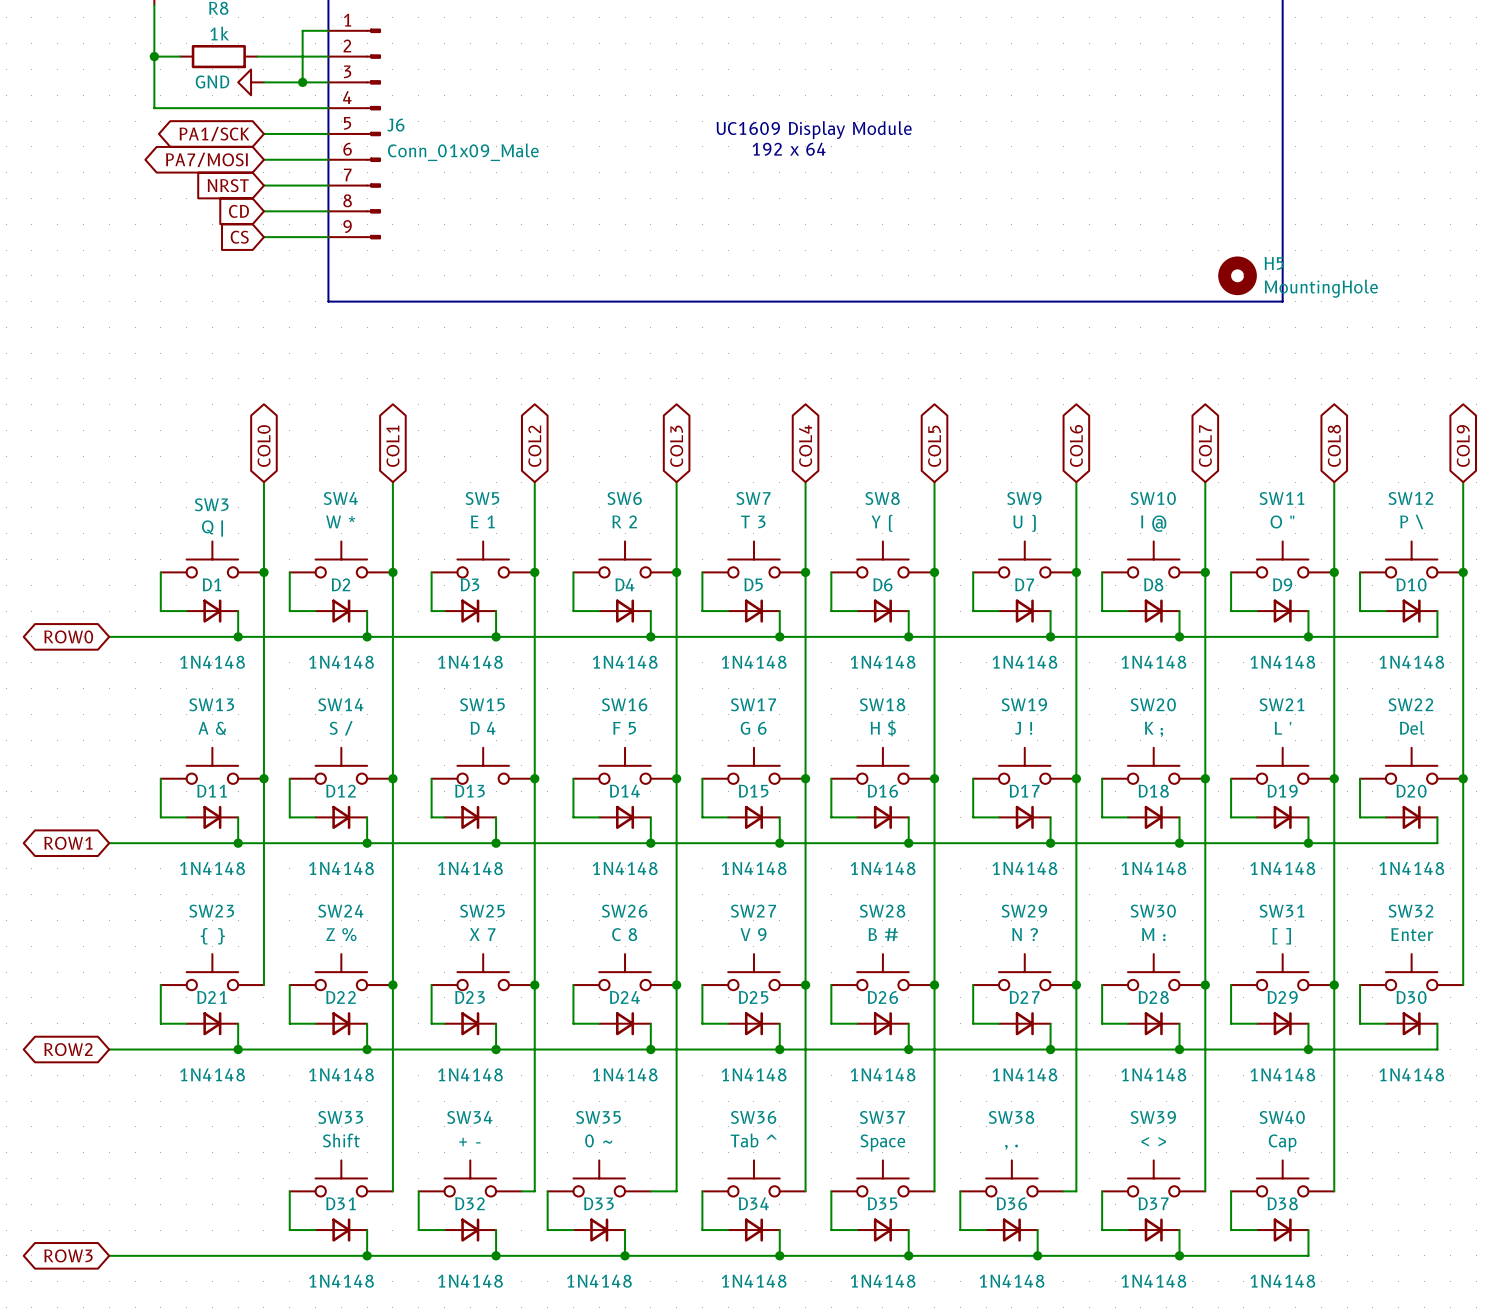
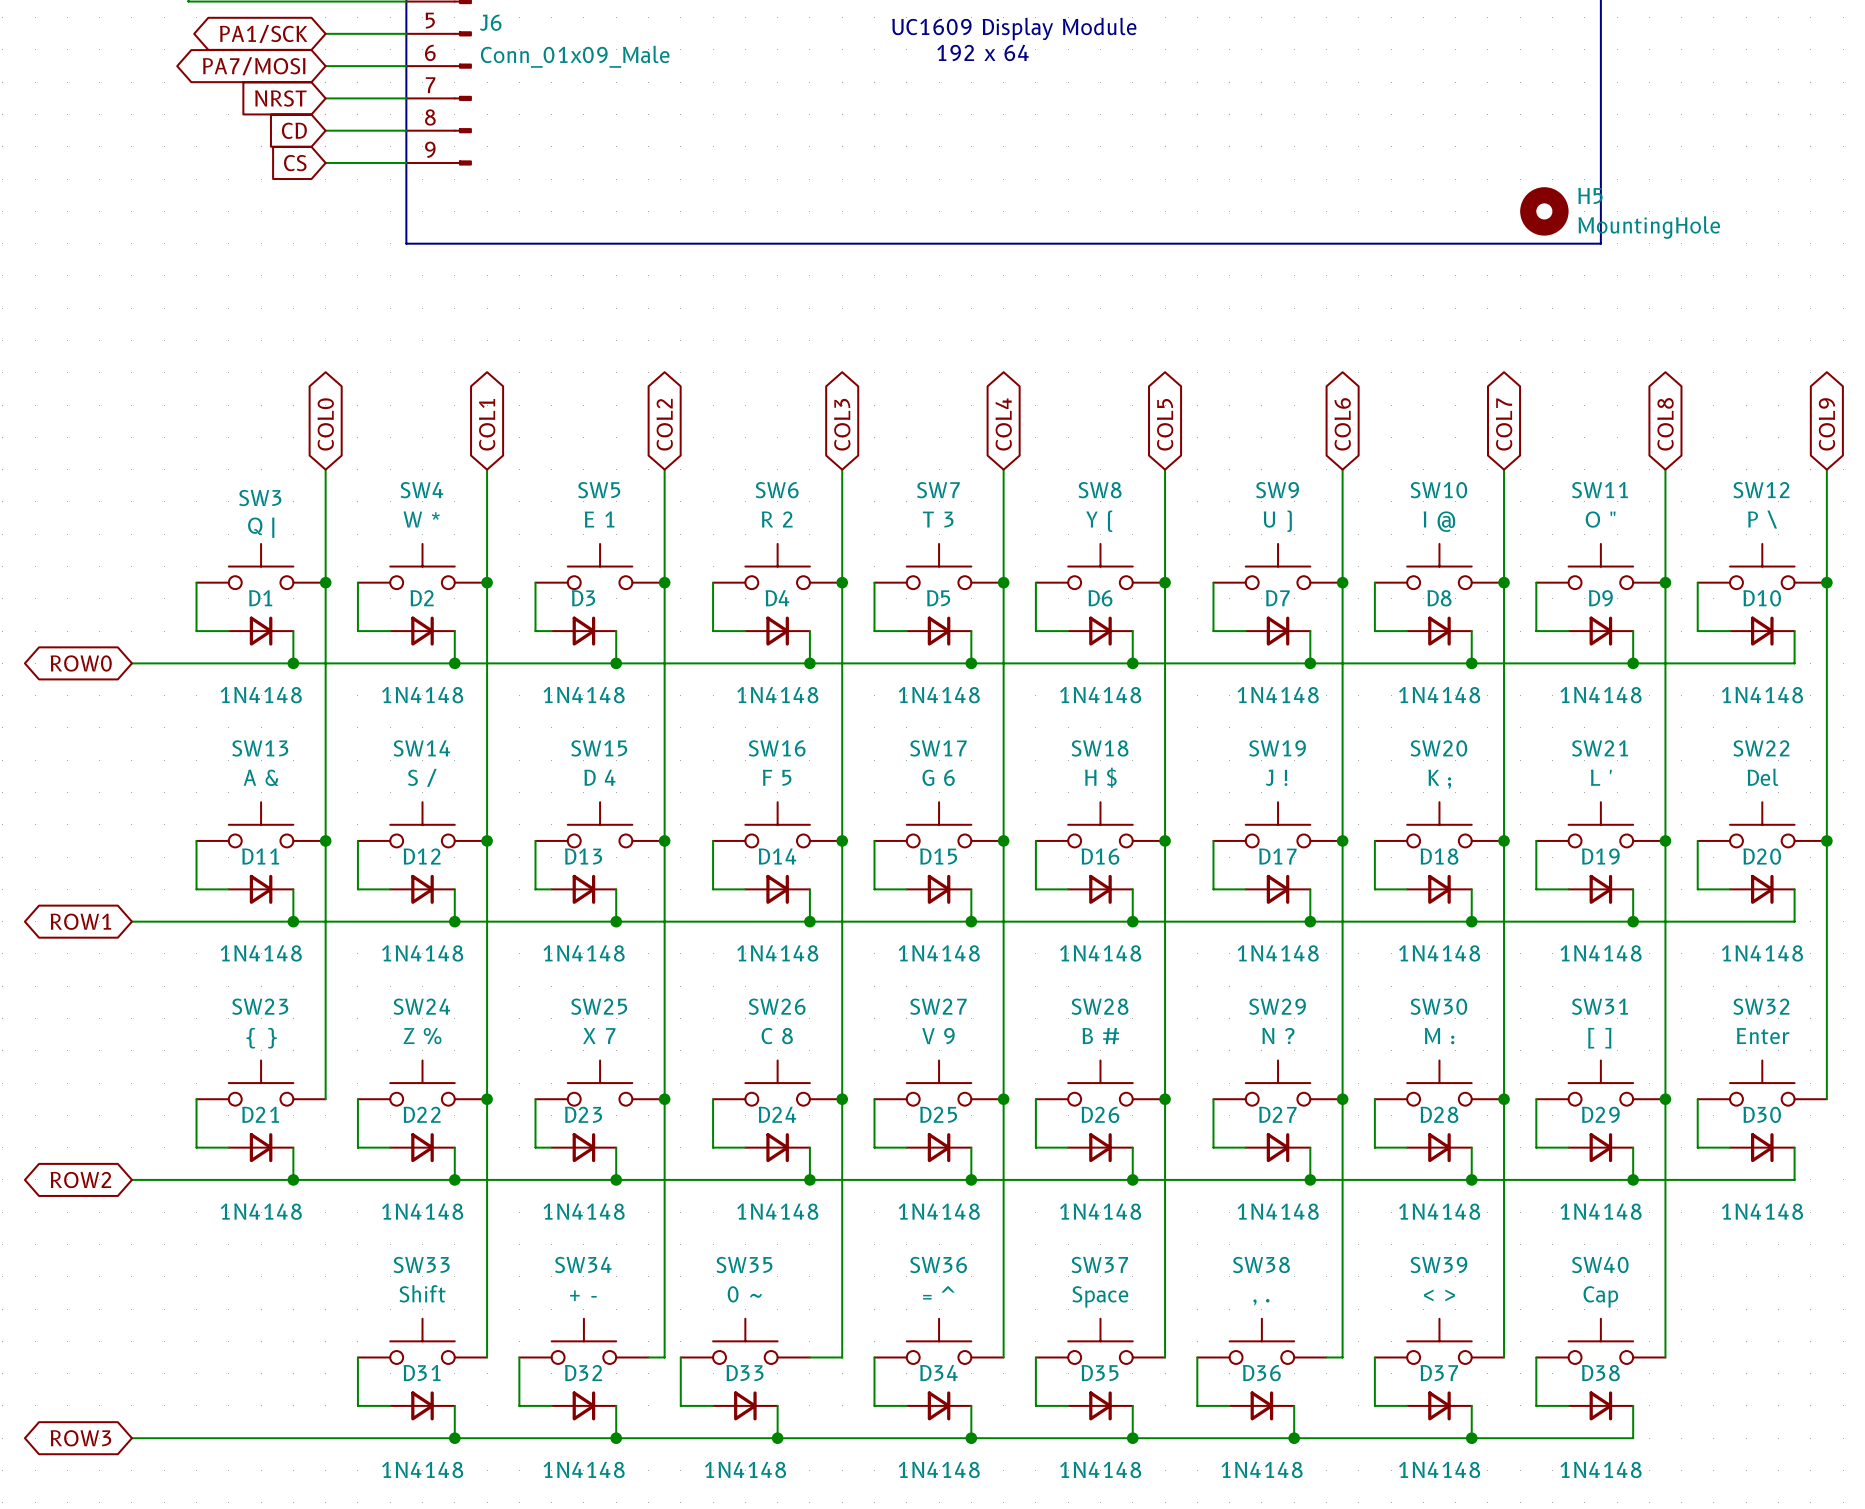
SW36 value: Tab ^ (753, 1140) -> = ^ (938, 1292)

